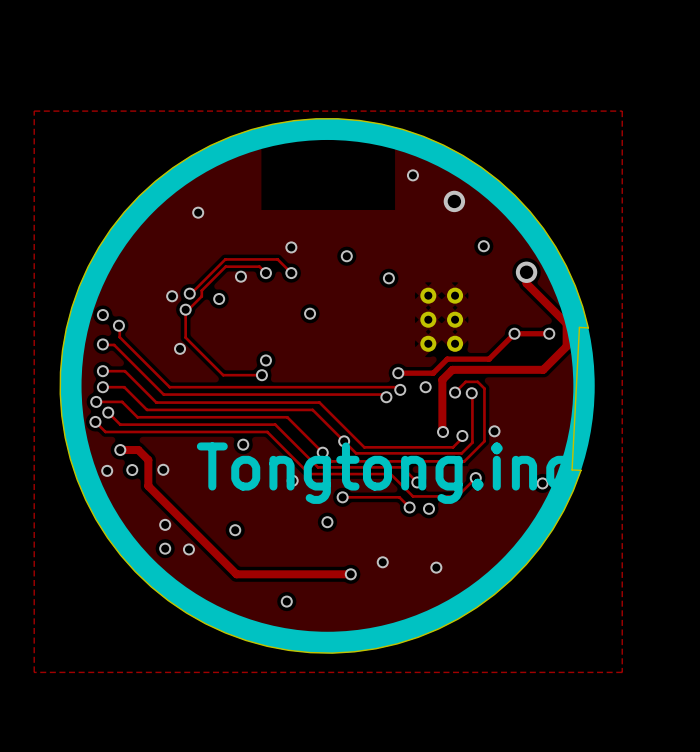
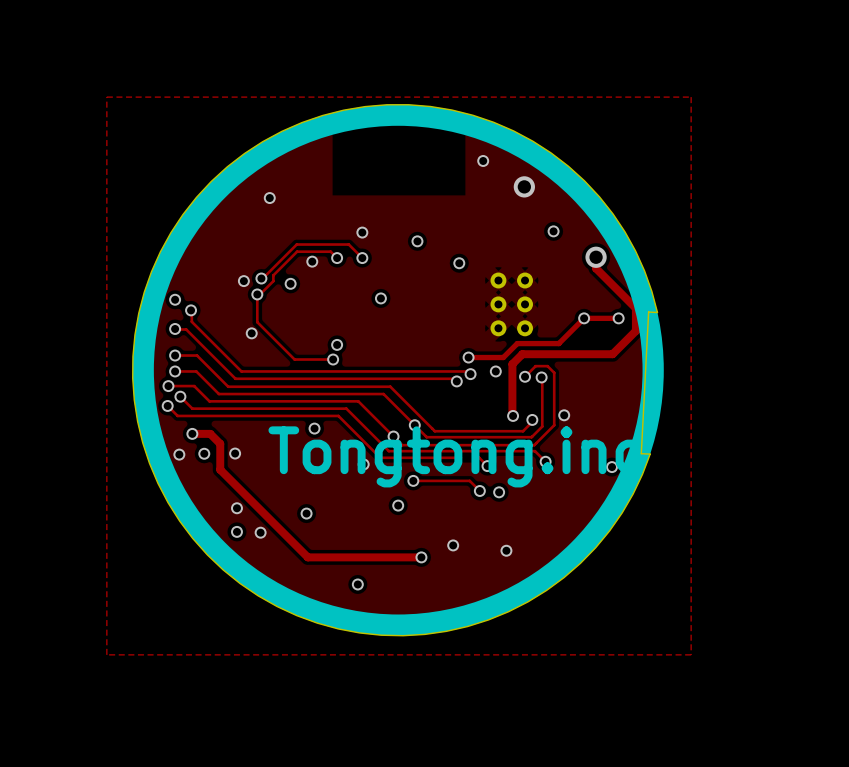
track: (390, 474) (413, 496) (457, 496) (475, 478) -> (472, 451) (534, 451) (545, 461)

